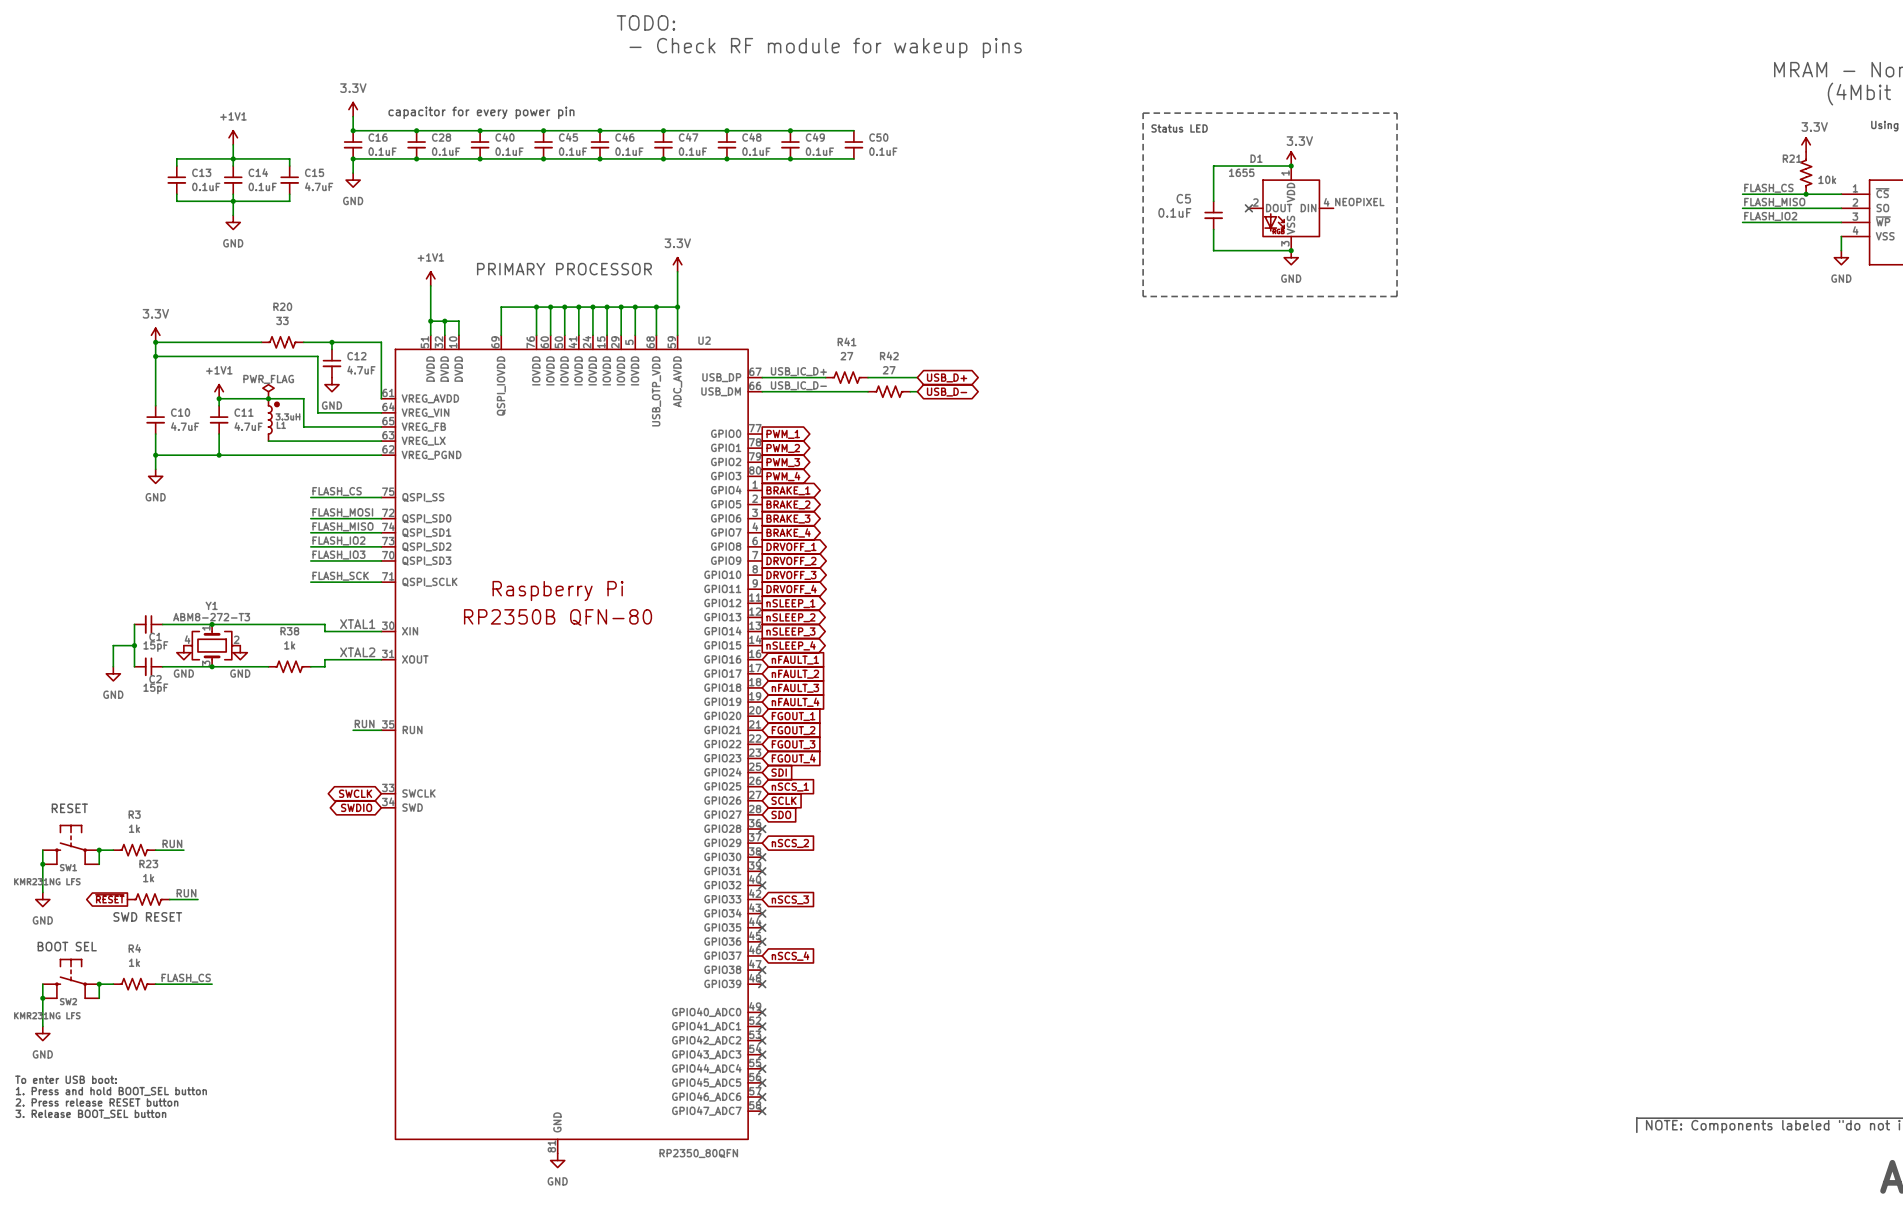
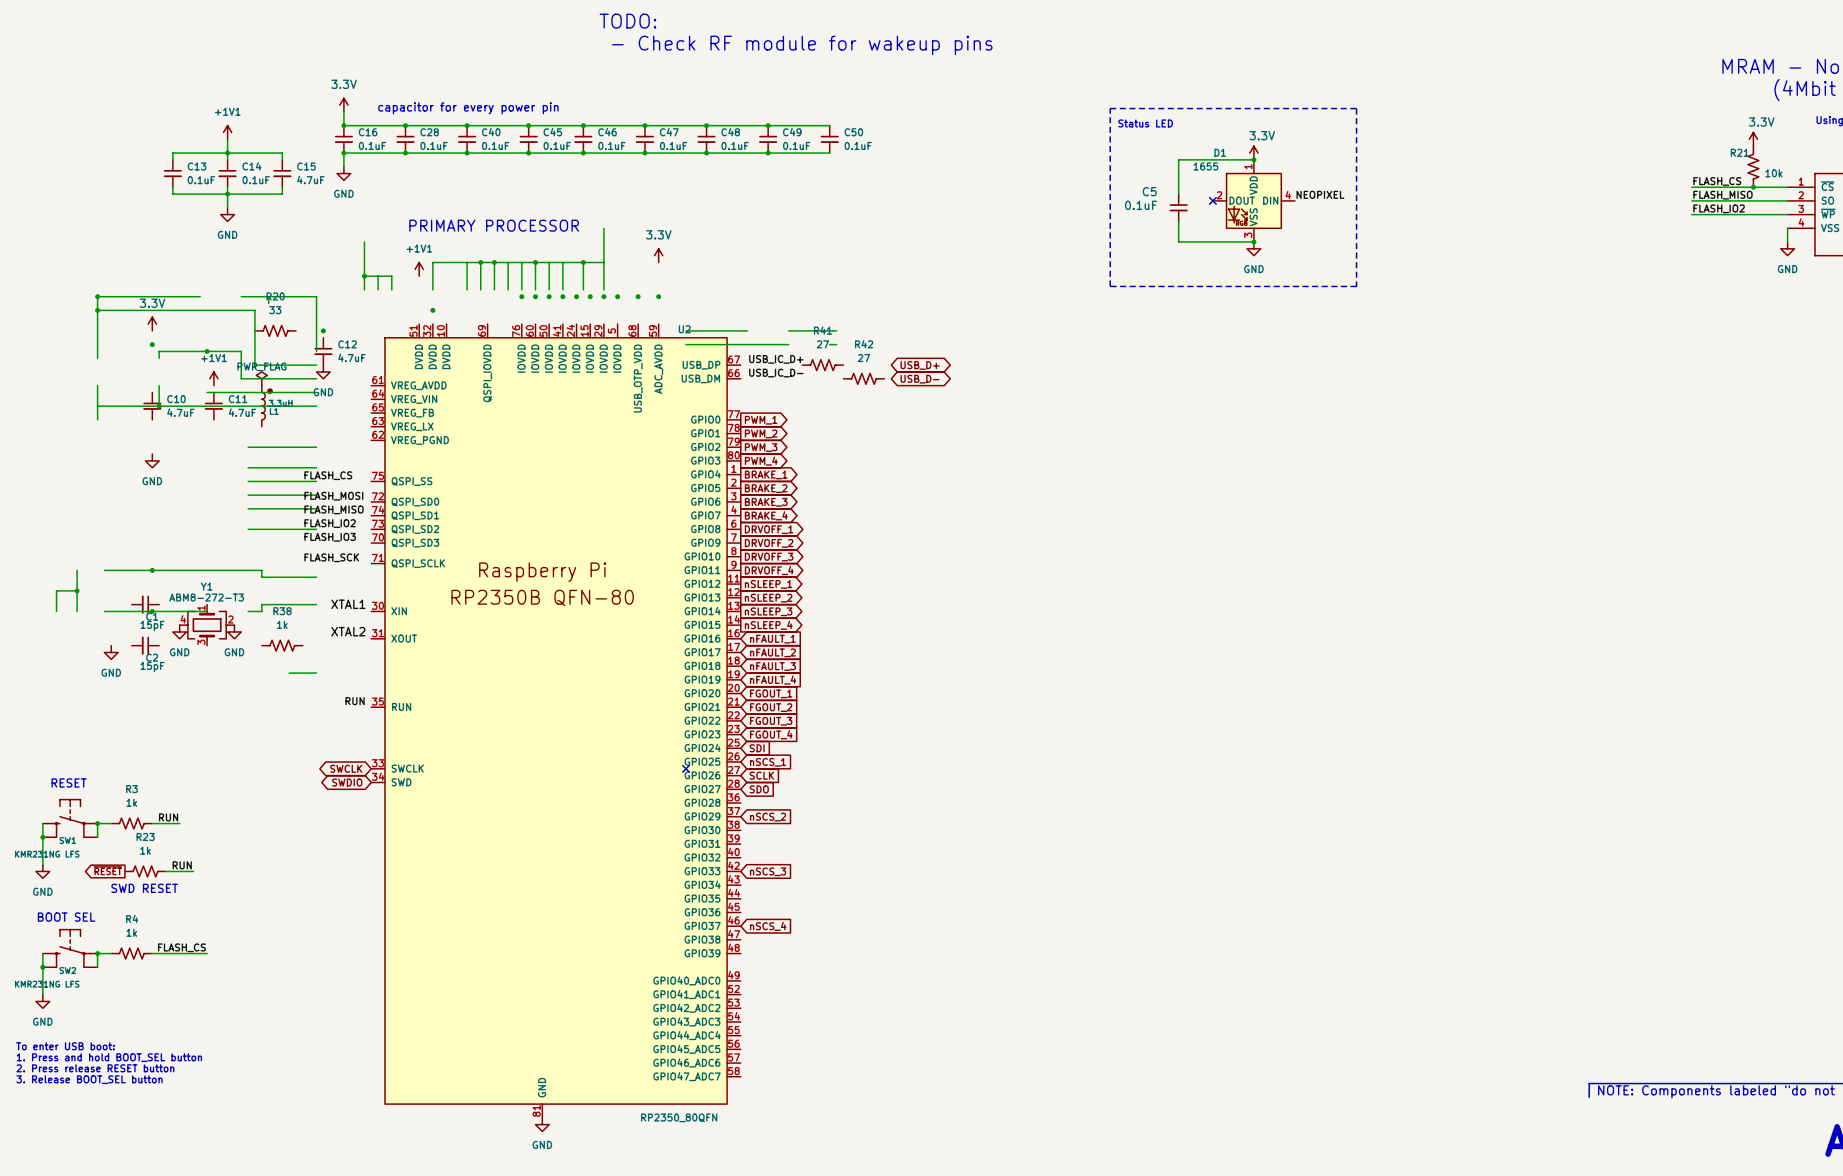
text position: PRIMARY PROCESSOR (564, 269) -> PRIMARY PROCESSOR (494, 225)
junction: none -> (480, 262)
junction: none -> (494, 262)
junction: none -> (535, 262)
junction: none -> (583, 262)
wire: (677, 271) (677, 335) -> (603, 228) (603, 289)
junction: none -> (364, 276)
wire: (430, 285) (430, 335) -> (364, 241) (364, 289)
junction: none -> (97, 296)
wire: (536, 307) (536, 335) -> (467, 262) (467, 289)
wire: (550, 307) (550, 335) -> (480, 262) (480, 289)
wire: (564, 307) (564, 335) -> (494, 262) (494, 289)
wire: (578, 307) (578, 335) -> (508, 262) (508, 289)
wire: (592, 307) (592, 335) -> (521, 262) (521, 289)
wire: (607, 307) (607, 335) -> (535, 262) (535, 289)
wire: (621, 307) (621, 335) -> (549, 262) (549, 289)
wire: (635, 307) (635, 335) -> (562, 262) (562, 289)
wire: (656, 307) (656, 335) -> (583, 262) (583, 289)
wire: (677, 307) (501, 307) (501, 335) -> (603, 262) (432, 262) (432, 289)
junction: none -> (97, 310)
wire: (430, 321) (458, 321) (458, 335) -> (364, 276) (391, 276) (391, 289)
junction: (430, 321) -> none
wire: (444, 321) (444, 335) -> (378, 276) (378, 289)
junction: (155, 342) -> none
wire: (261, 342) (155, 342) (155, 405) -> (200, 296) (97, 296) (97, 358)
wire: (303, 342) (381, 342) (381, 398) -> (241, 296) (316, 296) (316, 351)
wire: (331, 342) (331, 349) -> (268, 296) (268, 303)
wire: (155, 356) (317, 356) (317, 412) (381, 412) -> (97, 310) (254, 310) (254, 365) (316, 365)
junction: none -> (207, 351)
wire: (762, 377) (825, 377) -> (686, 330) (747, 330)
wire: (868, 377) (917, 377) -> (788, 330) (836, 330)
wire: (762, 391) (868, 391) -> (686, 344) (788, 344)
wire: (910, 391) (917, 391) -> (829, 344) (836, 344)
junction: (219, 398) -> none
junction: (268, 398) -> none
wire: (219, 405) (219, 398) (303, 398) (303, 426) (381, 426) -> (159, 358) (159, 351) (241, 351) (241, 378) (316, 378)
junction: none -> (159, 406)
wire: (155, 434) (155, 469) -> (97, 385) (97, 419)
wire: (219, 434) (219, 455) -> (159, 385) (159, 406)
wire: (268, 441) (381, 441) -> (207, 392) (316, 392)
wire: (155, 455) (381, 455) -> (97, 406) (316, 406)
junction: (155, 455) -> none
junction: (219, 455) -> none
wire: (324, 497) (381, 497) -> (248, 481) (302, 481)
wire: (310, 518) (381, 518) -> (248, 467) (316, 467)
wire: (310, 532) (381, 532) -> (248, 447) (316, 447)
wire: (324, 546) (381, 546) -> (248, 529) (302, 529)
wire: (310, 560) (381, 560) -> (248, 508) (316, 508)
wire: (310, 582) (381, 582) -> (248, 495) (316, 495)
wire: none -> (104, 570) (261, 570) (261, 577) (316, 577)
junction: none -> (152, 570)
junction: none -> (77, 590)
wire: (134, 624) (134, 666) -> (77, 570) (77, 611)
wire: (162, 624) (268, 624) -> (248, 611) (261, 611) (261, 604)
junction: (212, 624) -> none
wire: (324, 624) (324, 631) (381, 631) -> none
wire: (134, 645) (113, 645) (113, 666) -> (77, 590) (56, 590) (56, 611)
junction position: (134, 645) -> (152, 611)
wire: (381, 659) (324, 659) (324, 666) (310, 666) -> none
wire: (162, 666) (268, 666) -> (104, 611) (207, 611)
junction: (212, 666) -> none
wire: (353, 730) (381, 730) -> (289, 673) (316, 673)
no-connect mark: none -> (686, 768)
no-connect mark: (762, 829) -> none
no-connect mark: (762, 857) -> none
no-connect mark: (762, 871) -> none
no-connect mark: (762, 885) -> none
no-connect mark: (762, 913) -> none
no-connect mark: (762, 927) -> none
no-connect mark: (762, 941) -> none
no-connect mark: (762, 970) -> none
no-connect mark: (762, 984) -> none
no-connect mark: (762, 1012) -> none
no-connect mark: (762, 1026) -> none
no-connect mark: (762, 1040) -> none
no-connect mark: (762, 1054) -> none
no-connect mark: (762, 1068) -> none
no-connect mark: (762, 1082) -> none
no-connect mark: (762, 1097) -> none
no-connect mark: (762, 1111) -> none

